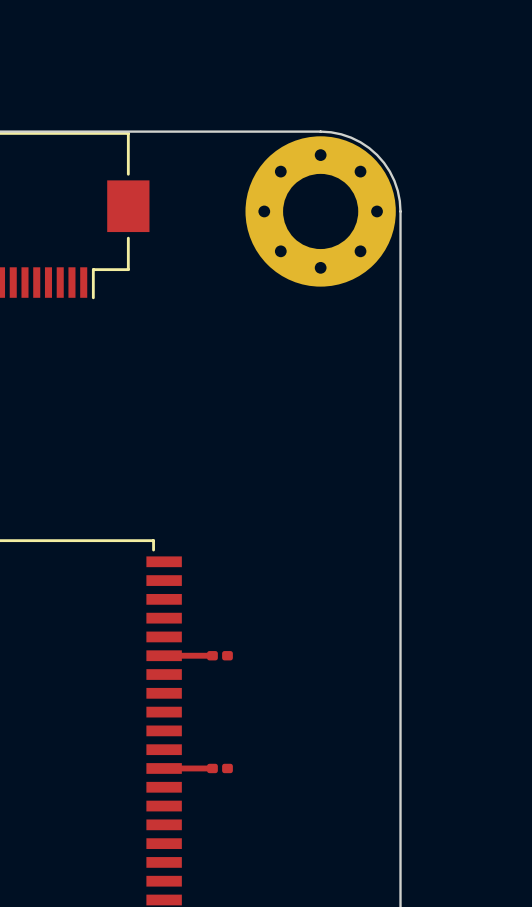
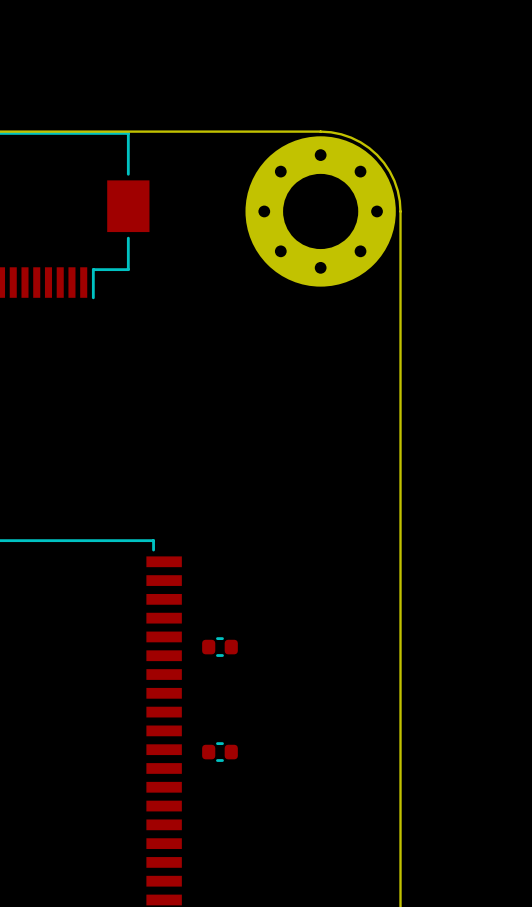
part footprint: [207, 651, 233, 661] -> [202, 637, 238, 657]
top track: (164, 655) (212, 655) -> none
part footprint: [207, 763, 233, 774] -> [202, 742, 238, 762]
top track: (164, 768) (212, 768) -> none

